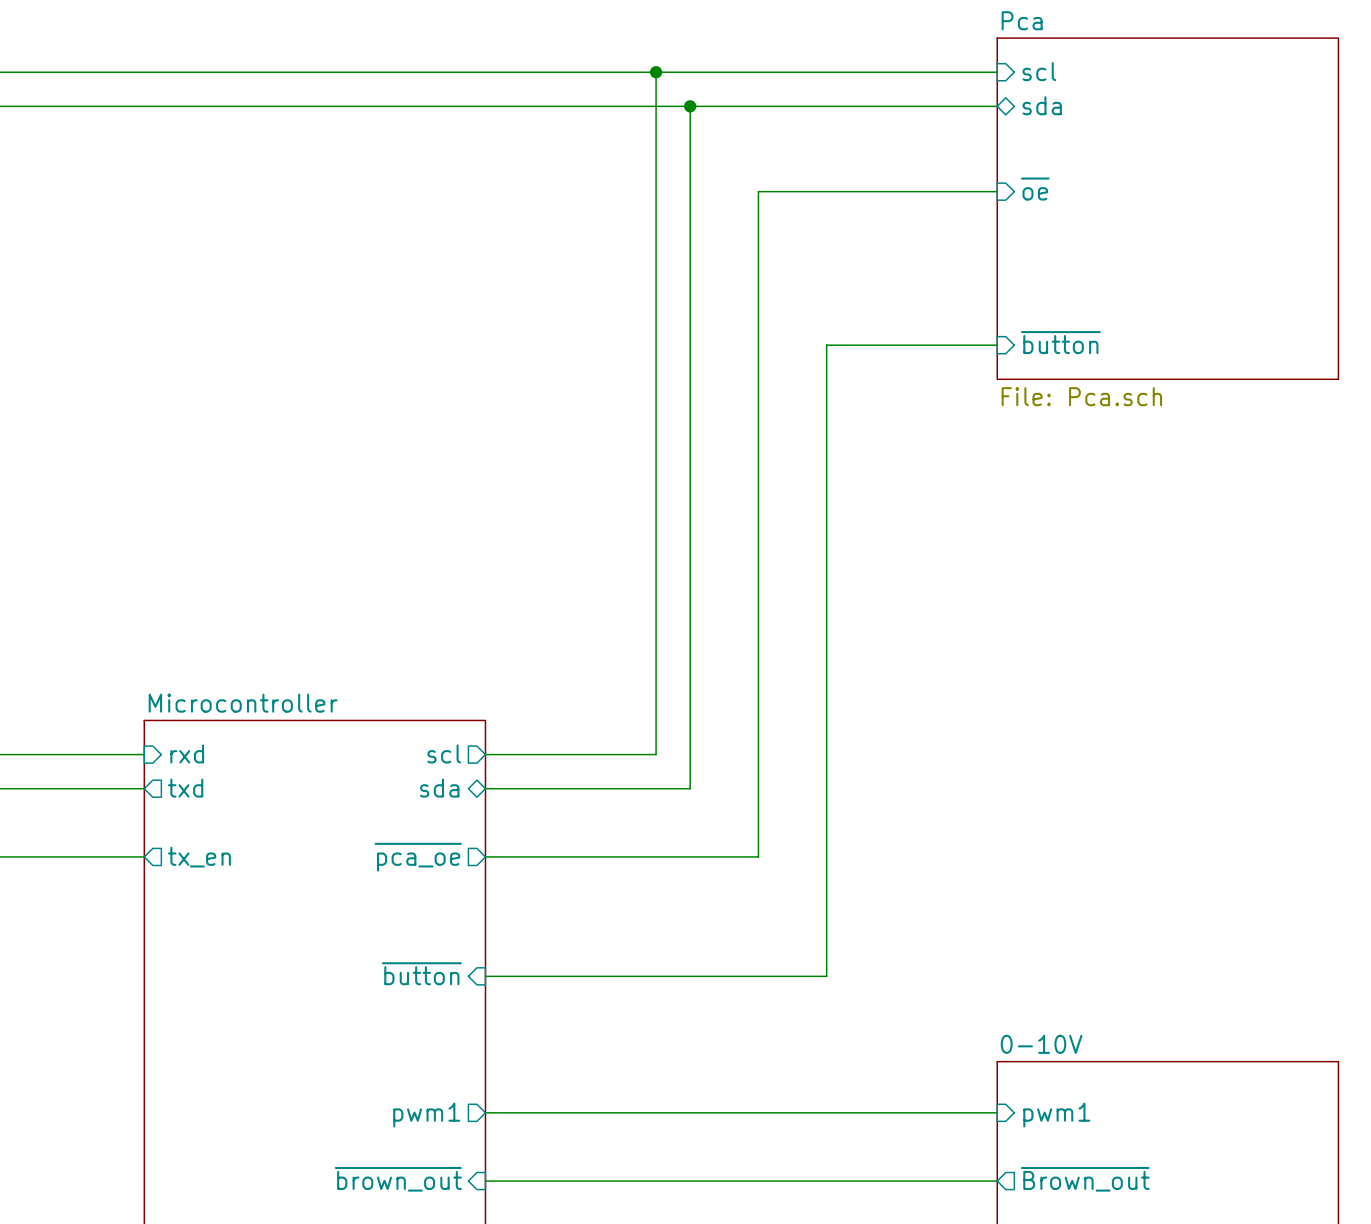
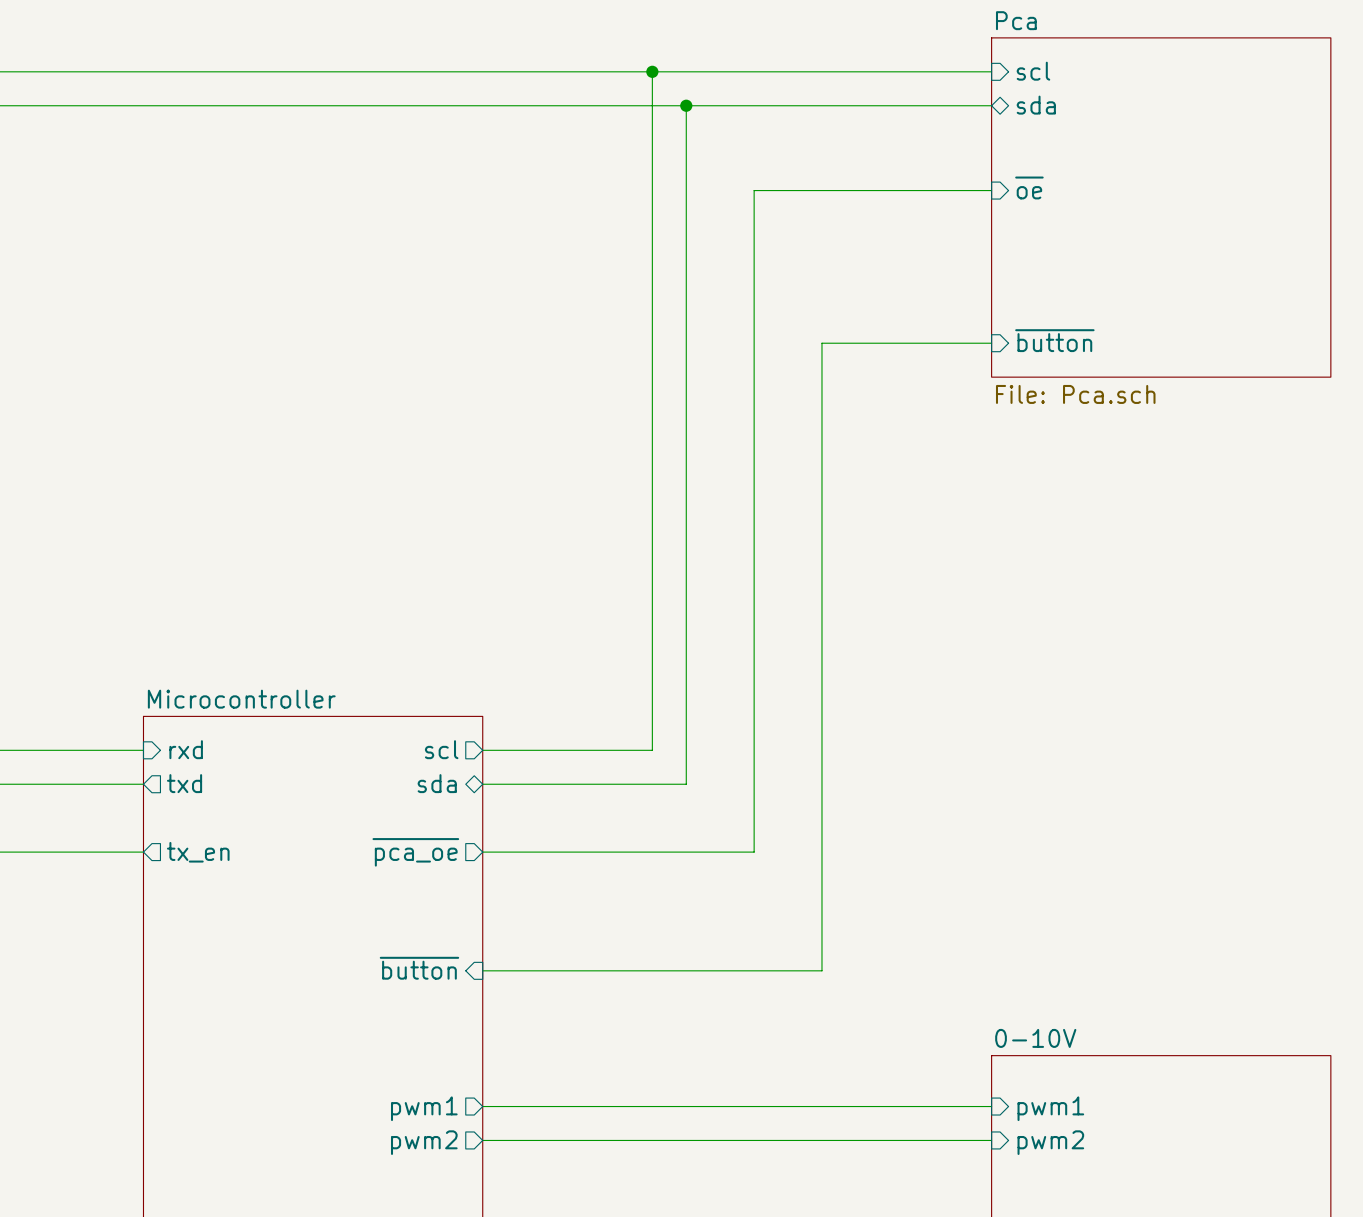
sheet pin: none -> pwm2 (424, 1142)
sheet pin: none -> pwm2 (1050, 1142)
sheet pin: ~{brown_out} (398, 1179) -> none
sheet pin: ~{Brown_out} (1085, 1179) -> none
wire: (485, 1181) (997, 1181) -> (482, 1140) (991, 1140)

